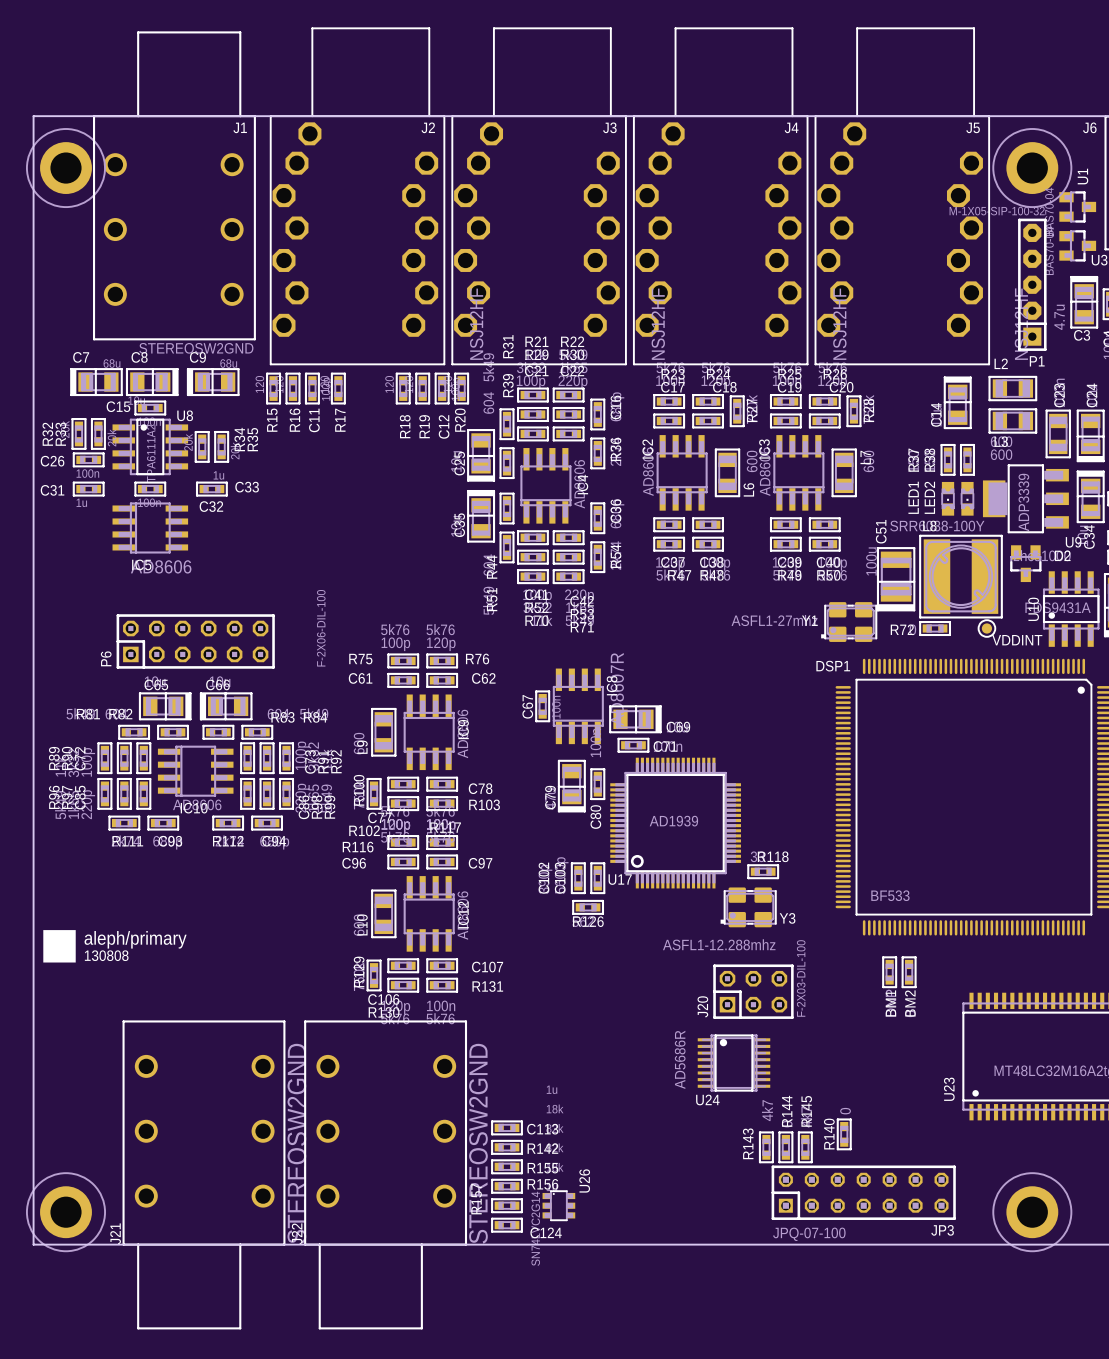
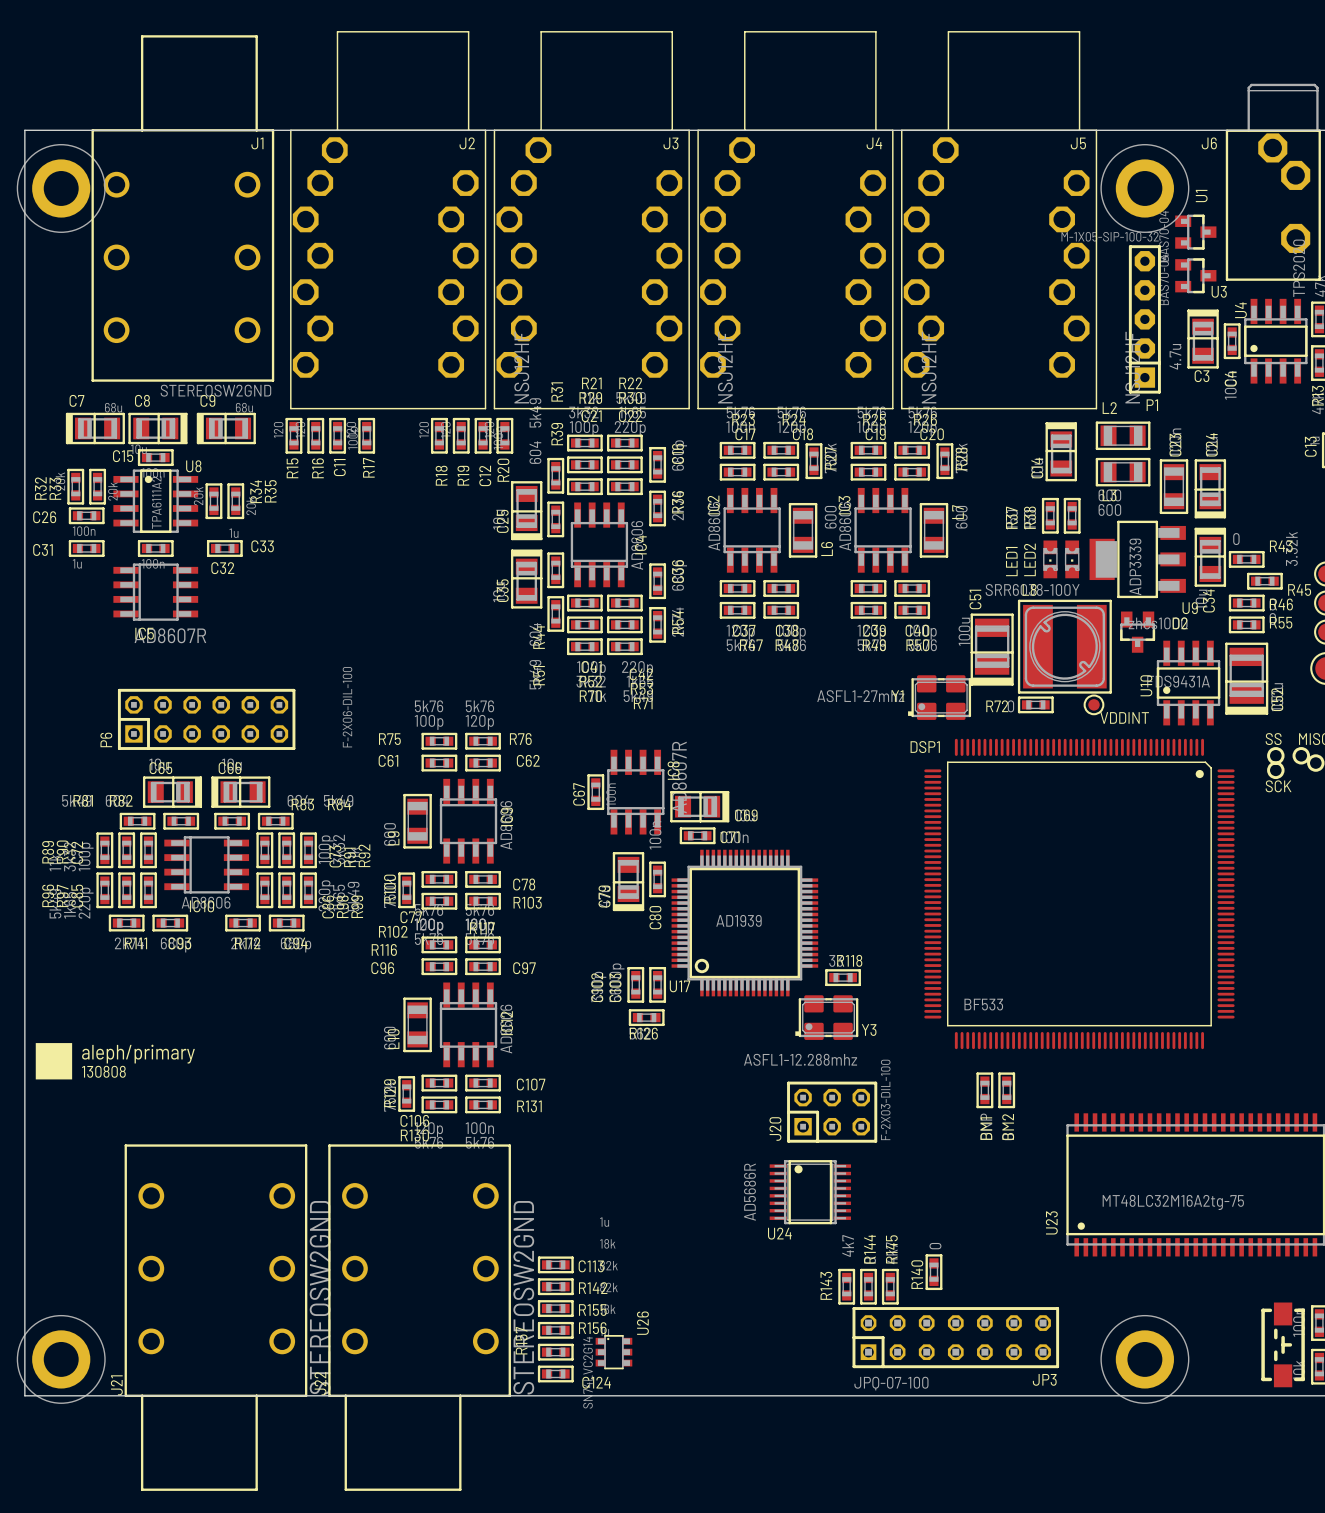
IC5 value: AD8606 (161, 566) -> AD8607R (170, 635)

